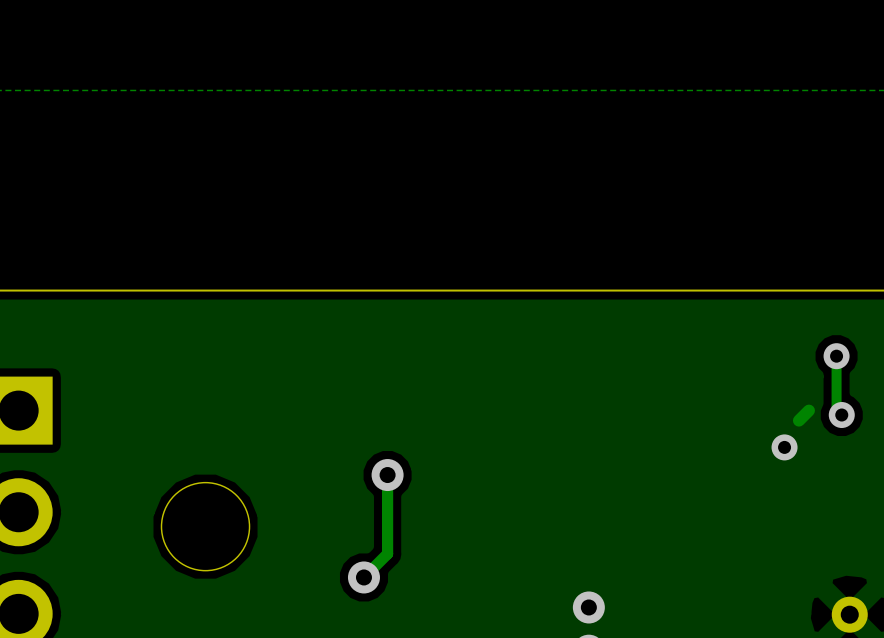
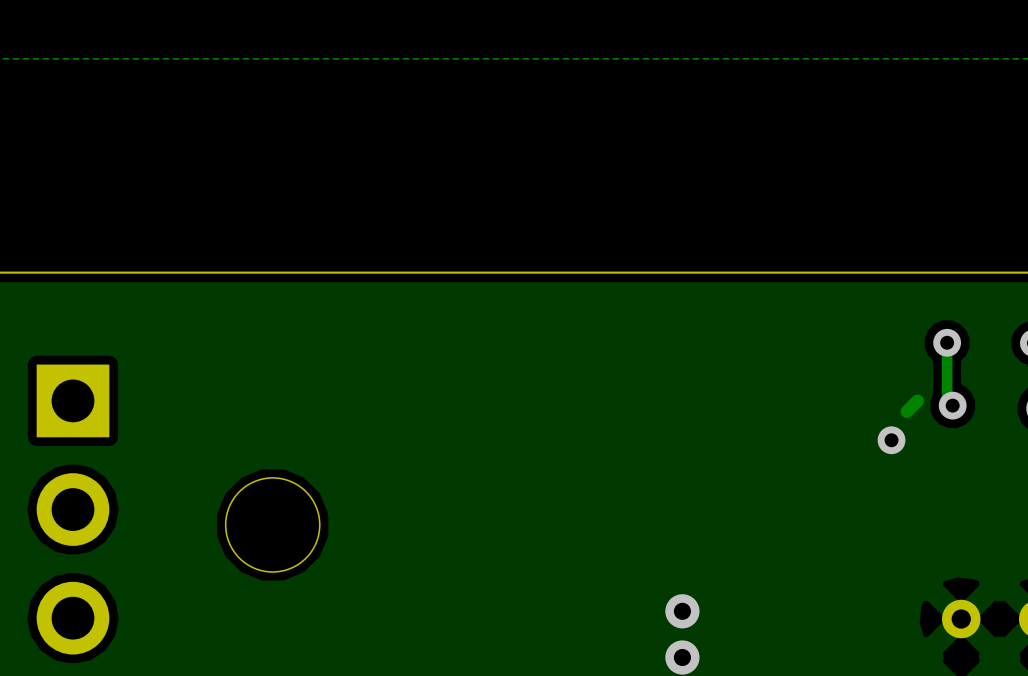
track: (387, 475) (387, 553) (363, 577) -> none
via: (387, 475) -> none
via: (363, 577) -> none

